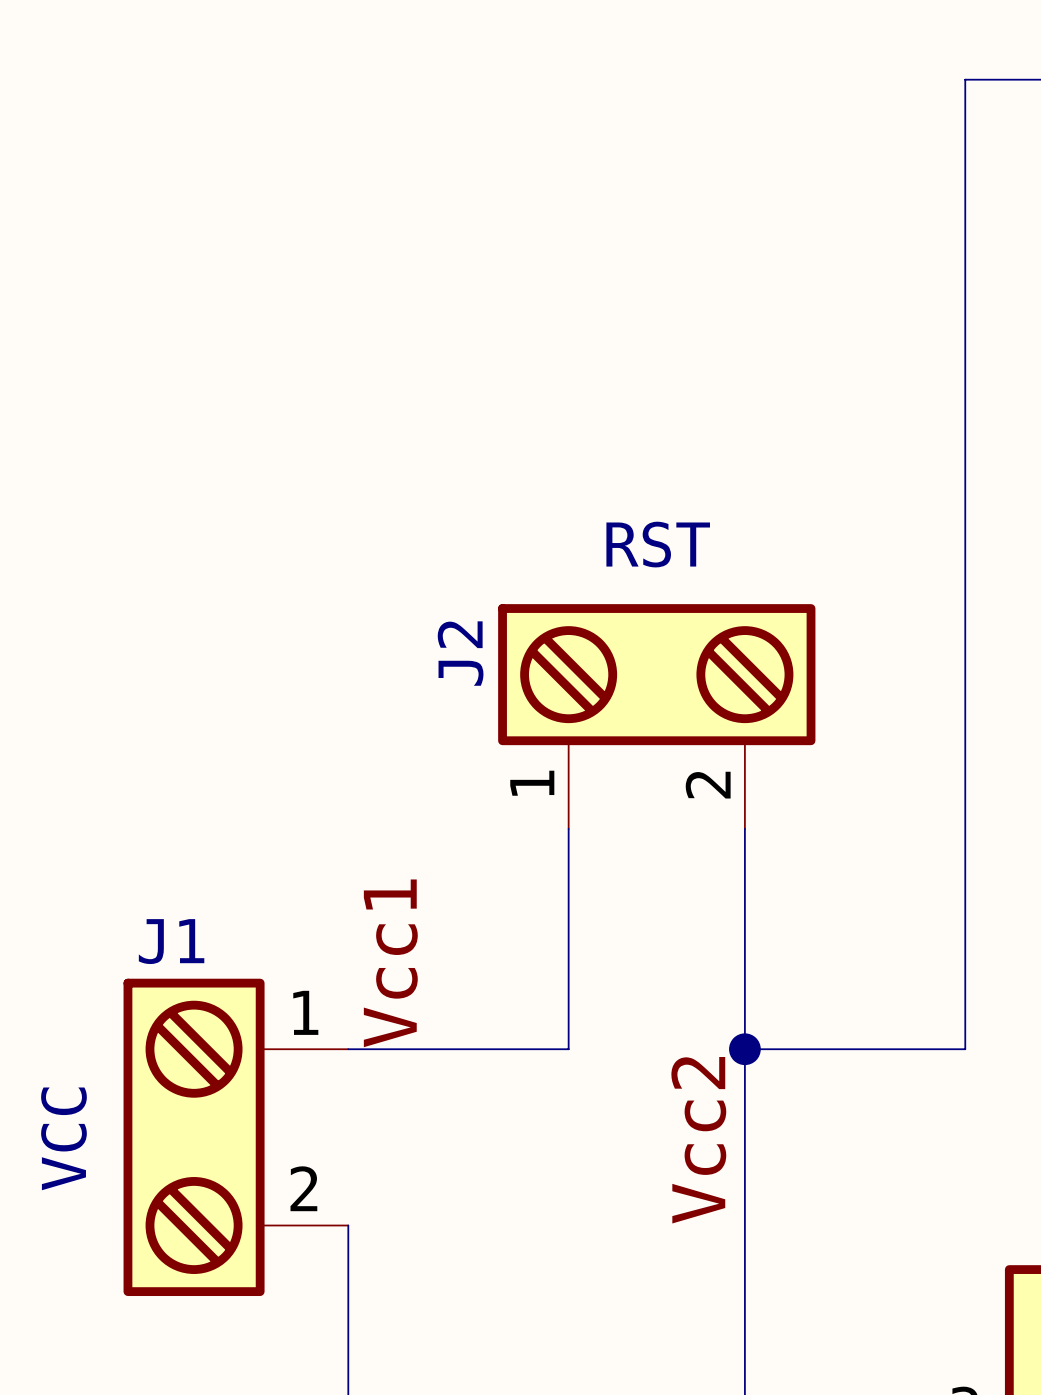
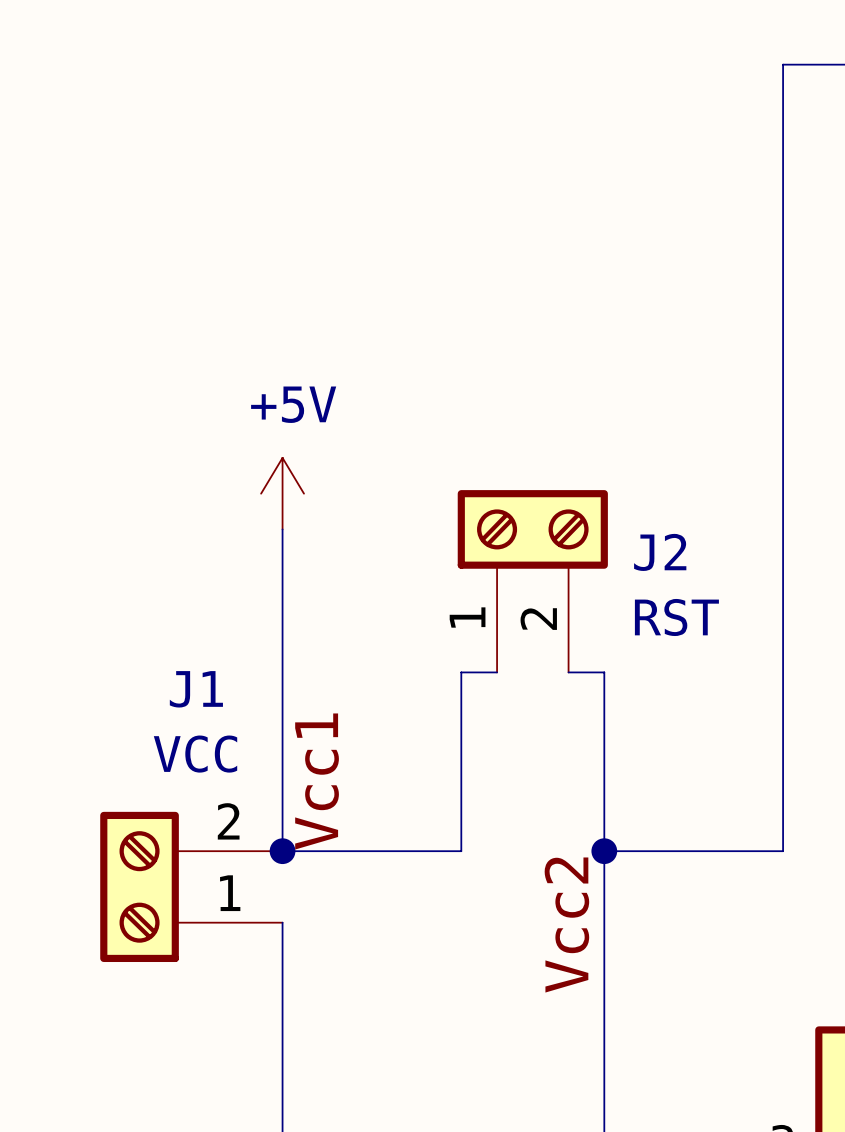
J2 value position: RST (658, 544) -> RST (676, 617)
J2 symbol: [498, 604, 816, 829] -> [457, 490, 608, 673]
power symbol: none -> +5V (282, 493)
wire: none -> (282, 529) (282, 851)
J2 name position: J2 (460, 653) -> J2 (660, 552)
wire: none -> (461, 672) (497, 672)
wire: none -> (568, 672) (604, 672)
J1 name position: J1 (171, 941) -> J1 (196, 689)
J1 symbol: [123, 978, 349, 1297] -> [100, 811, 283, 963]
junction: none -> (282, 851)
wire: none -> (282, 922) (282, 994)
J1 value position: VCC (63, 1138) -> VCC (195, 754)

